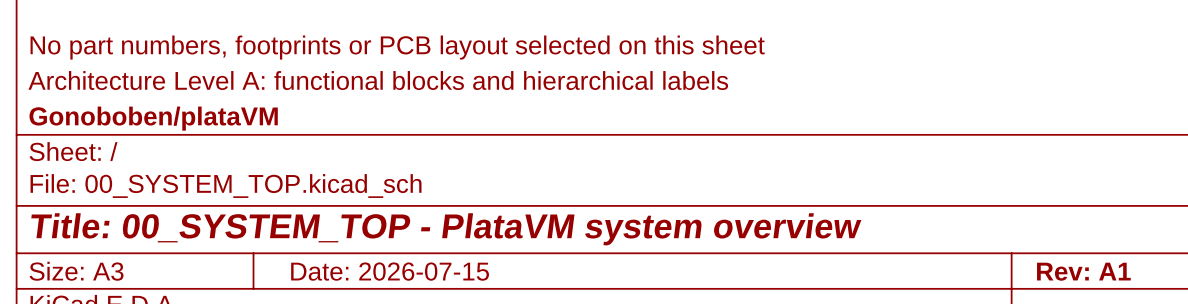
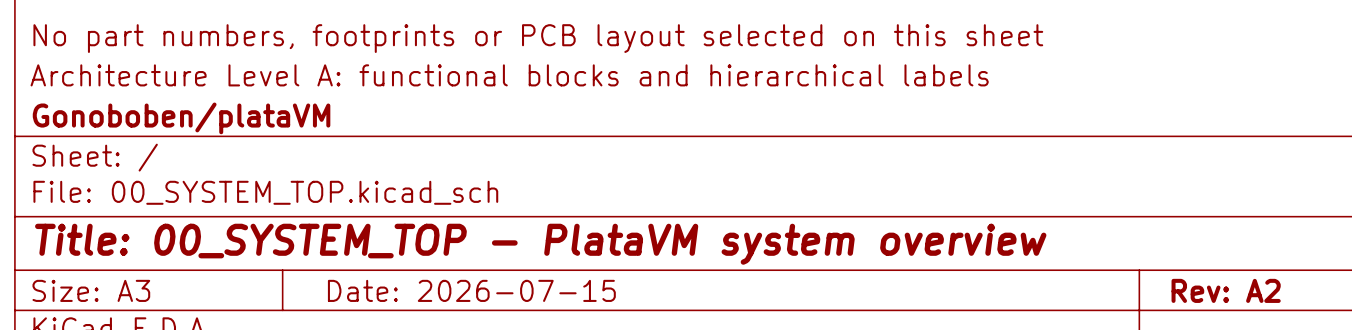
title block: Rev: A1 (1083, 271) -> Rev: A2 (1226, 290)

